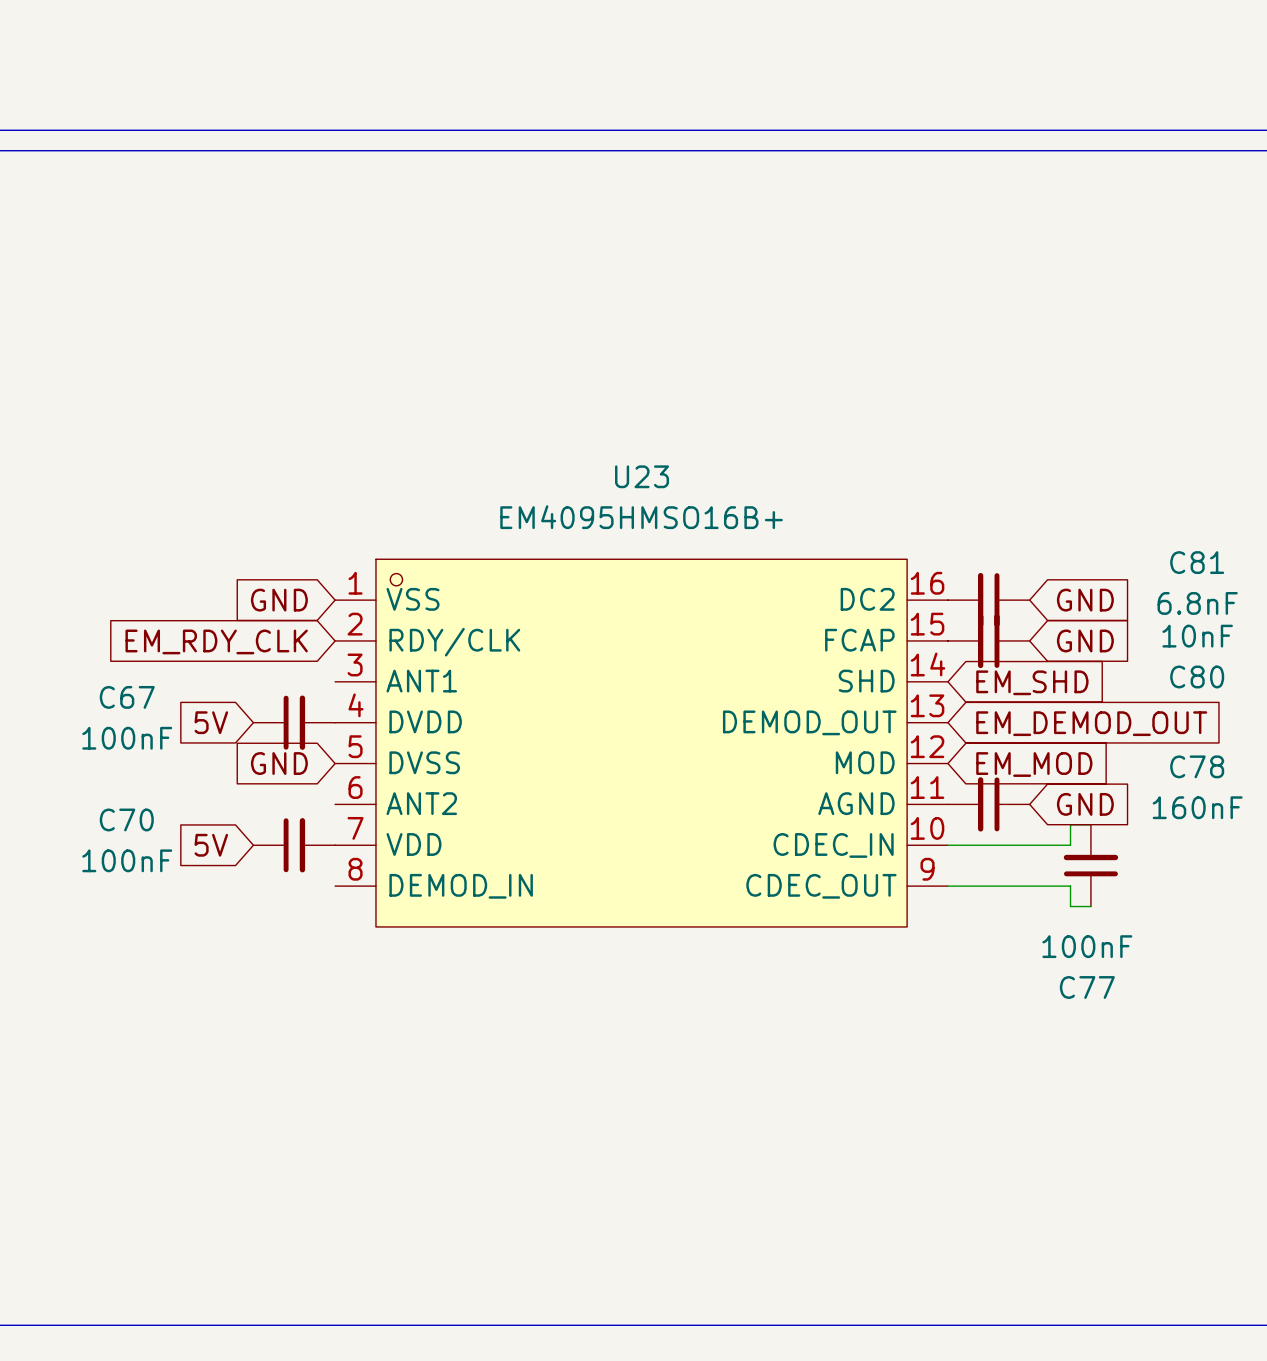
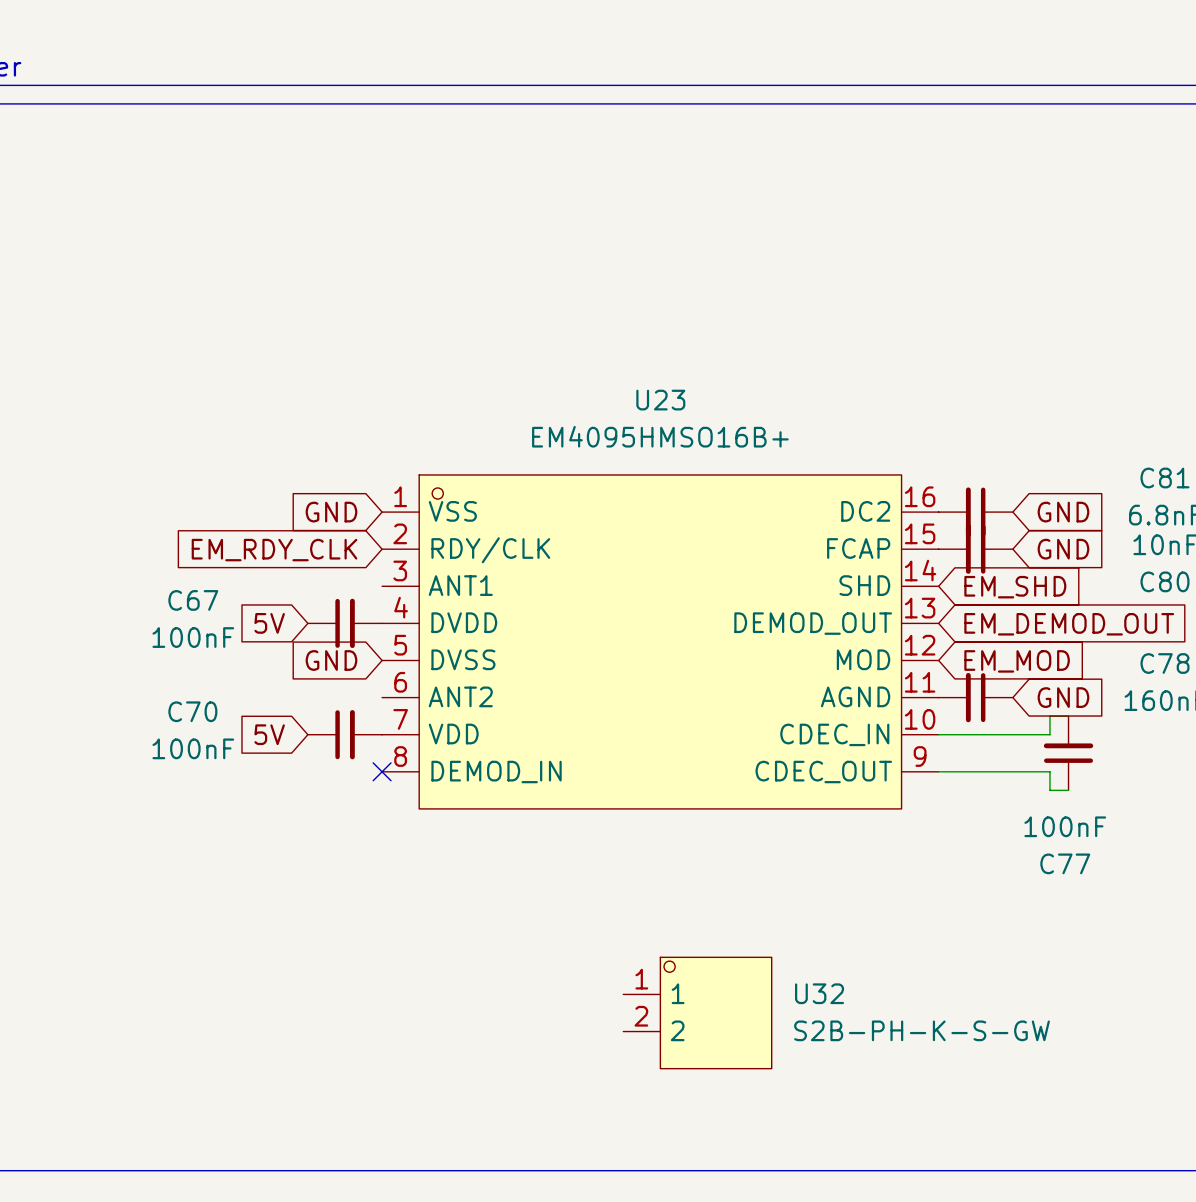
no-connect mark: none -> (382, 771)
U32: none -> S2B-PH-K-S-GW (697, 1012)

